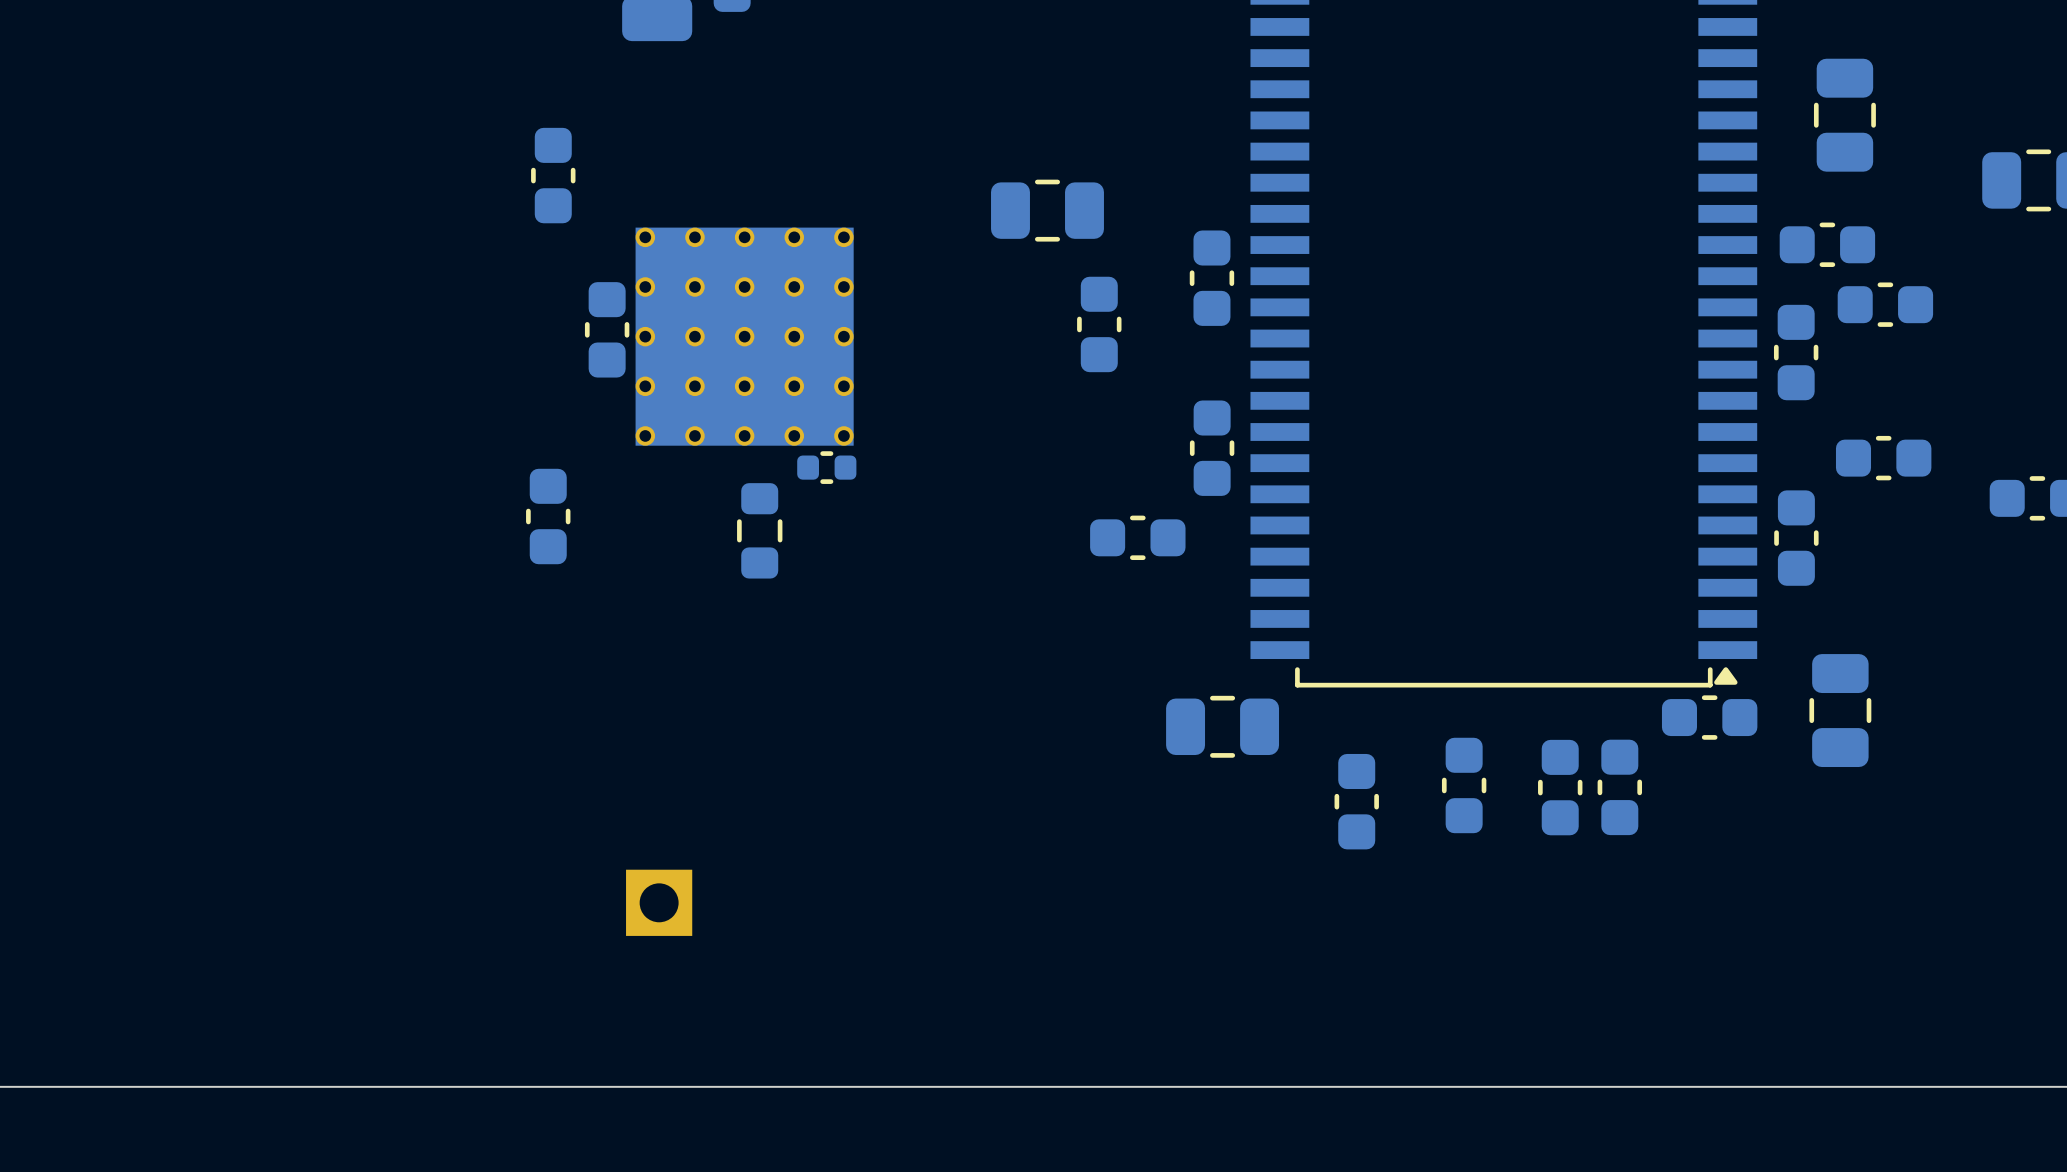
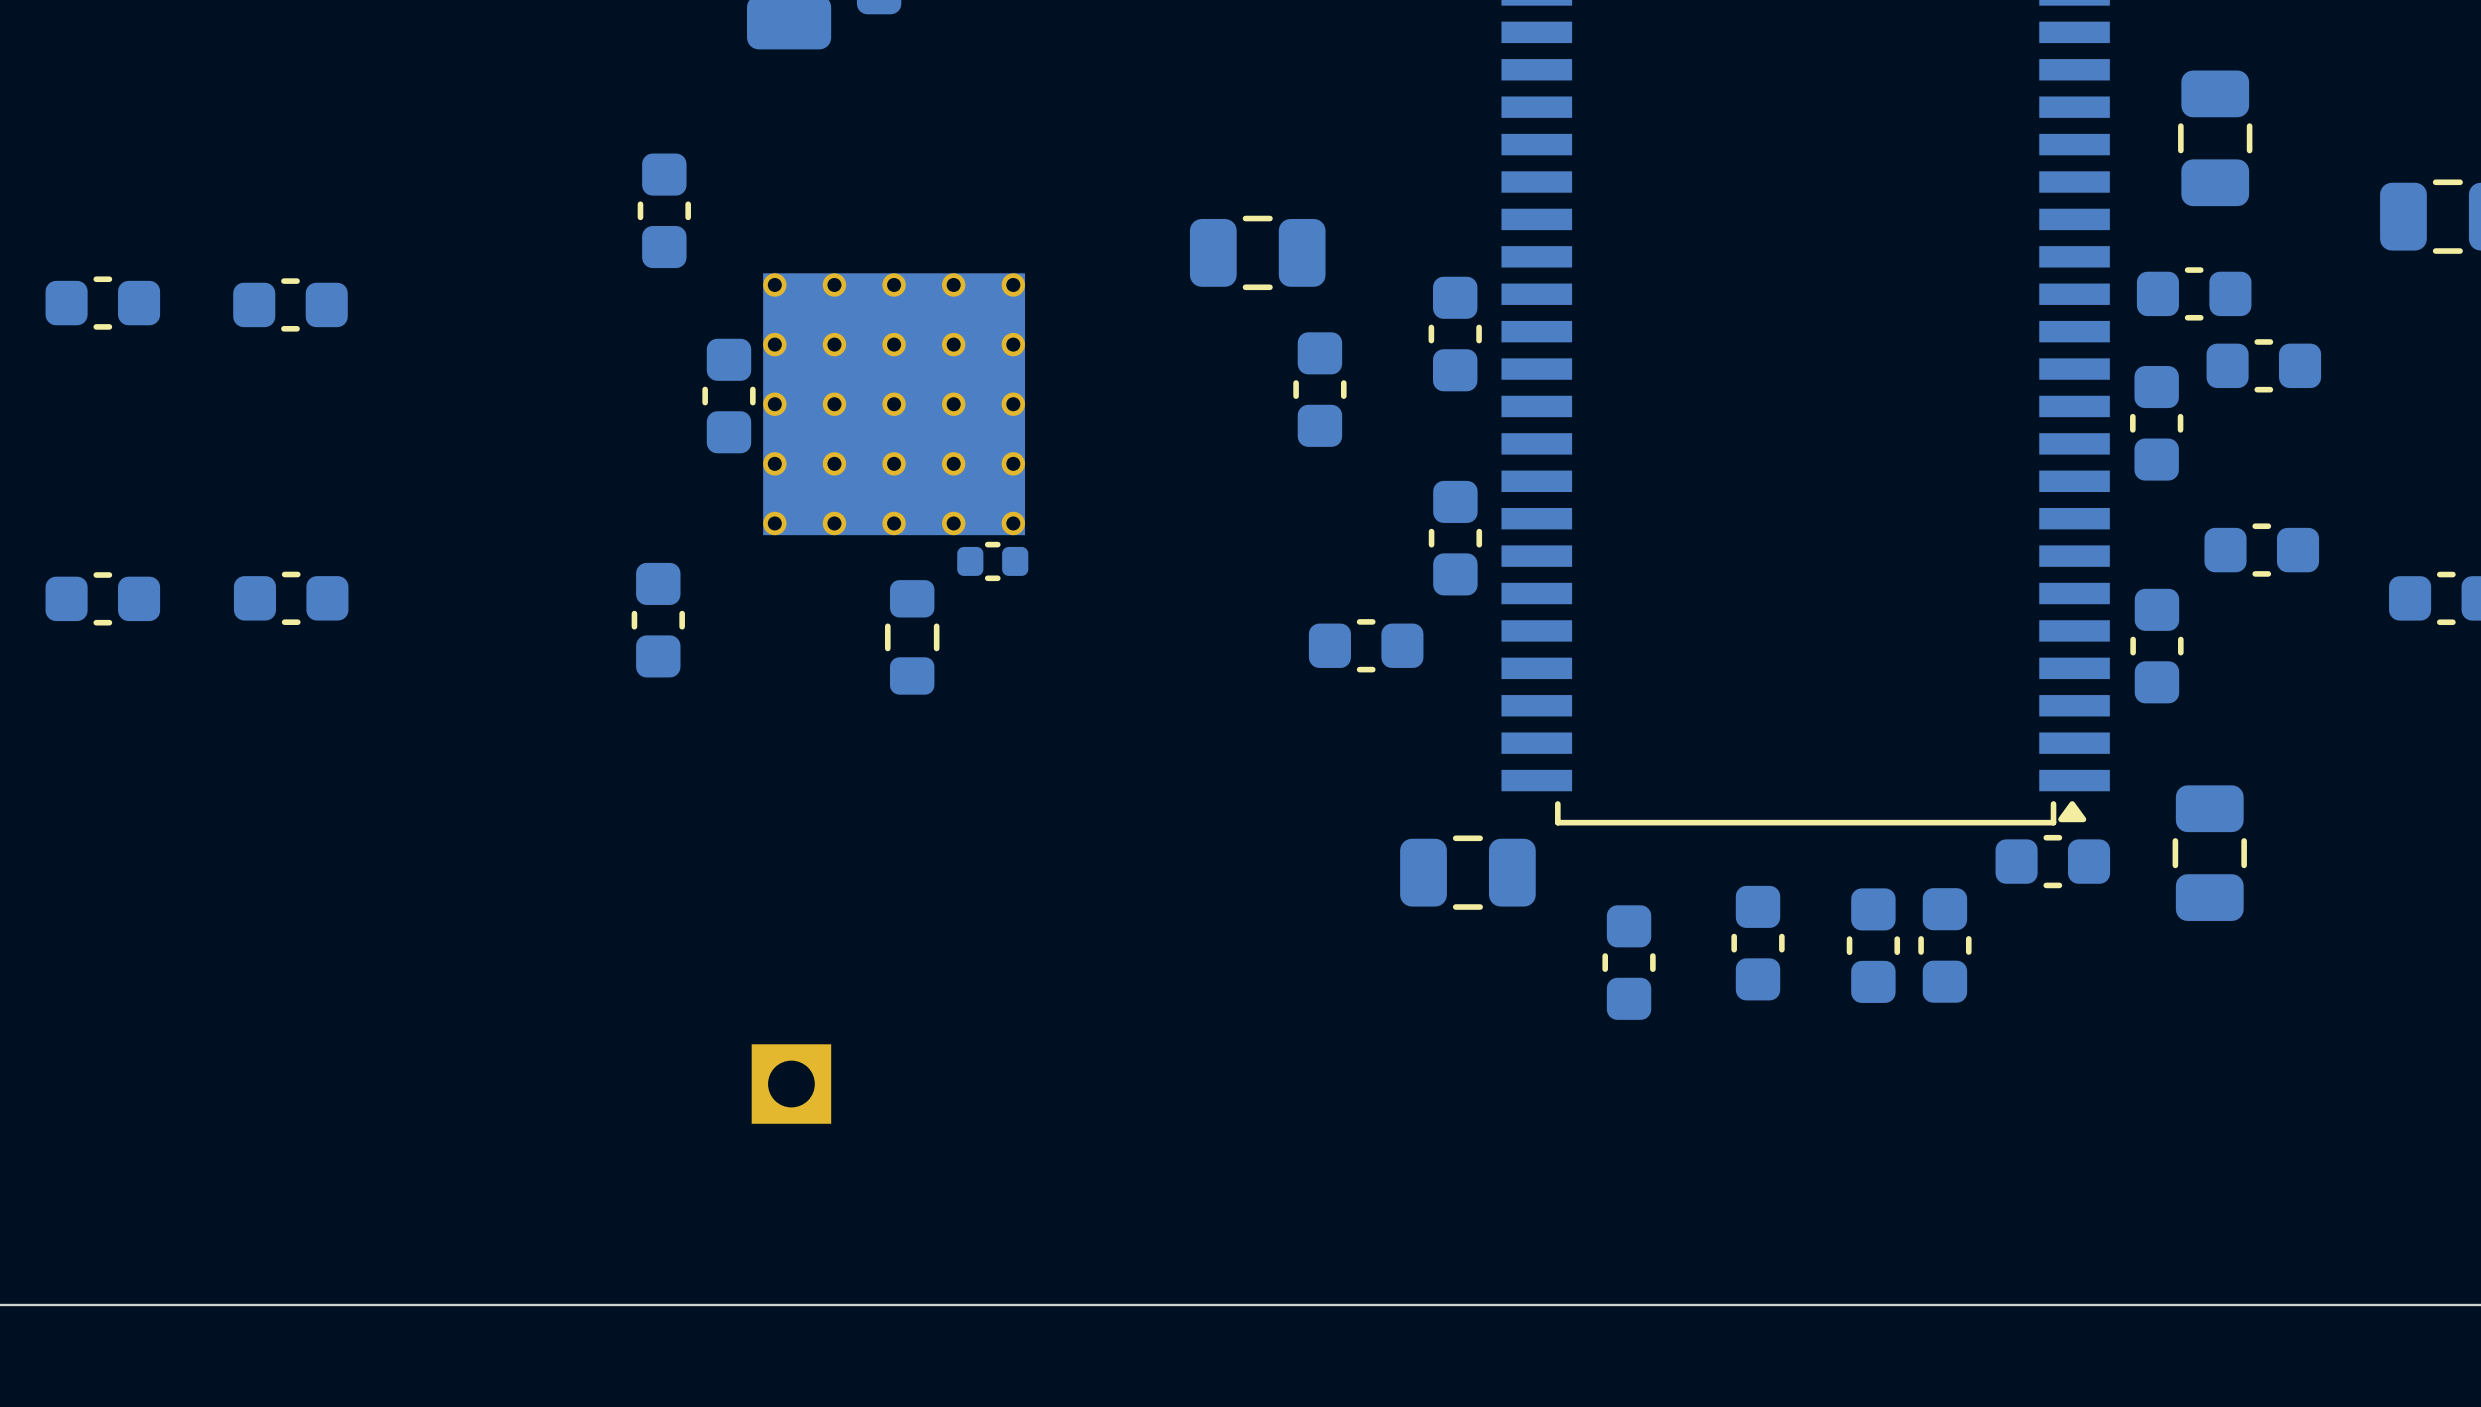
part: none -> (102, 303)
part: none -> (290, 304)
part: none -> (102, 598)
part: none -> (291, 598)

